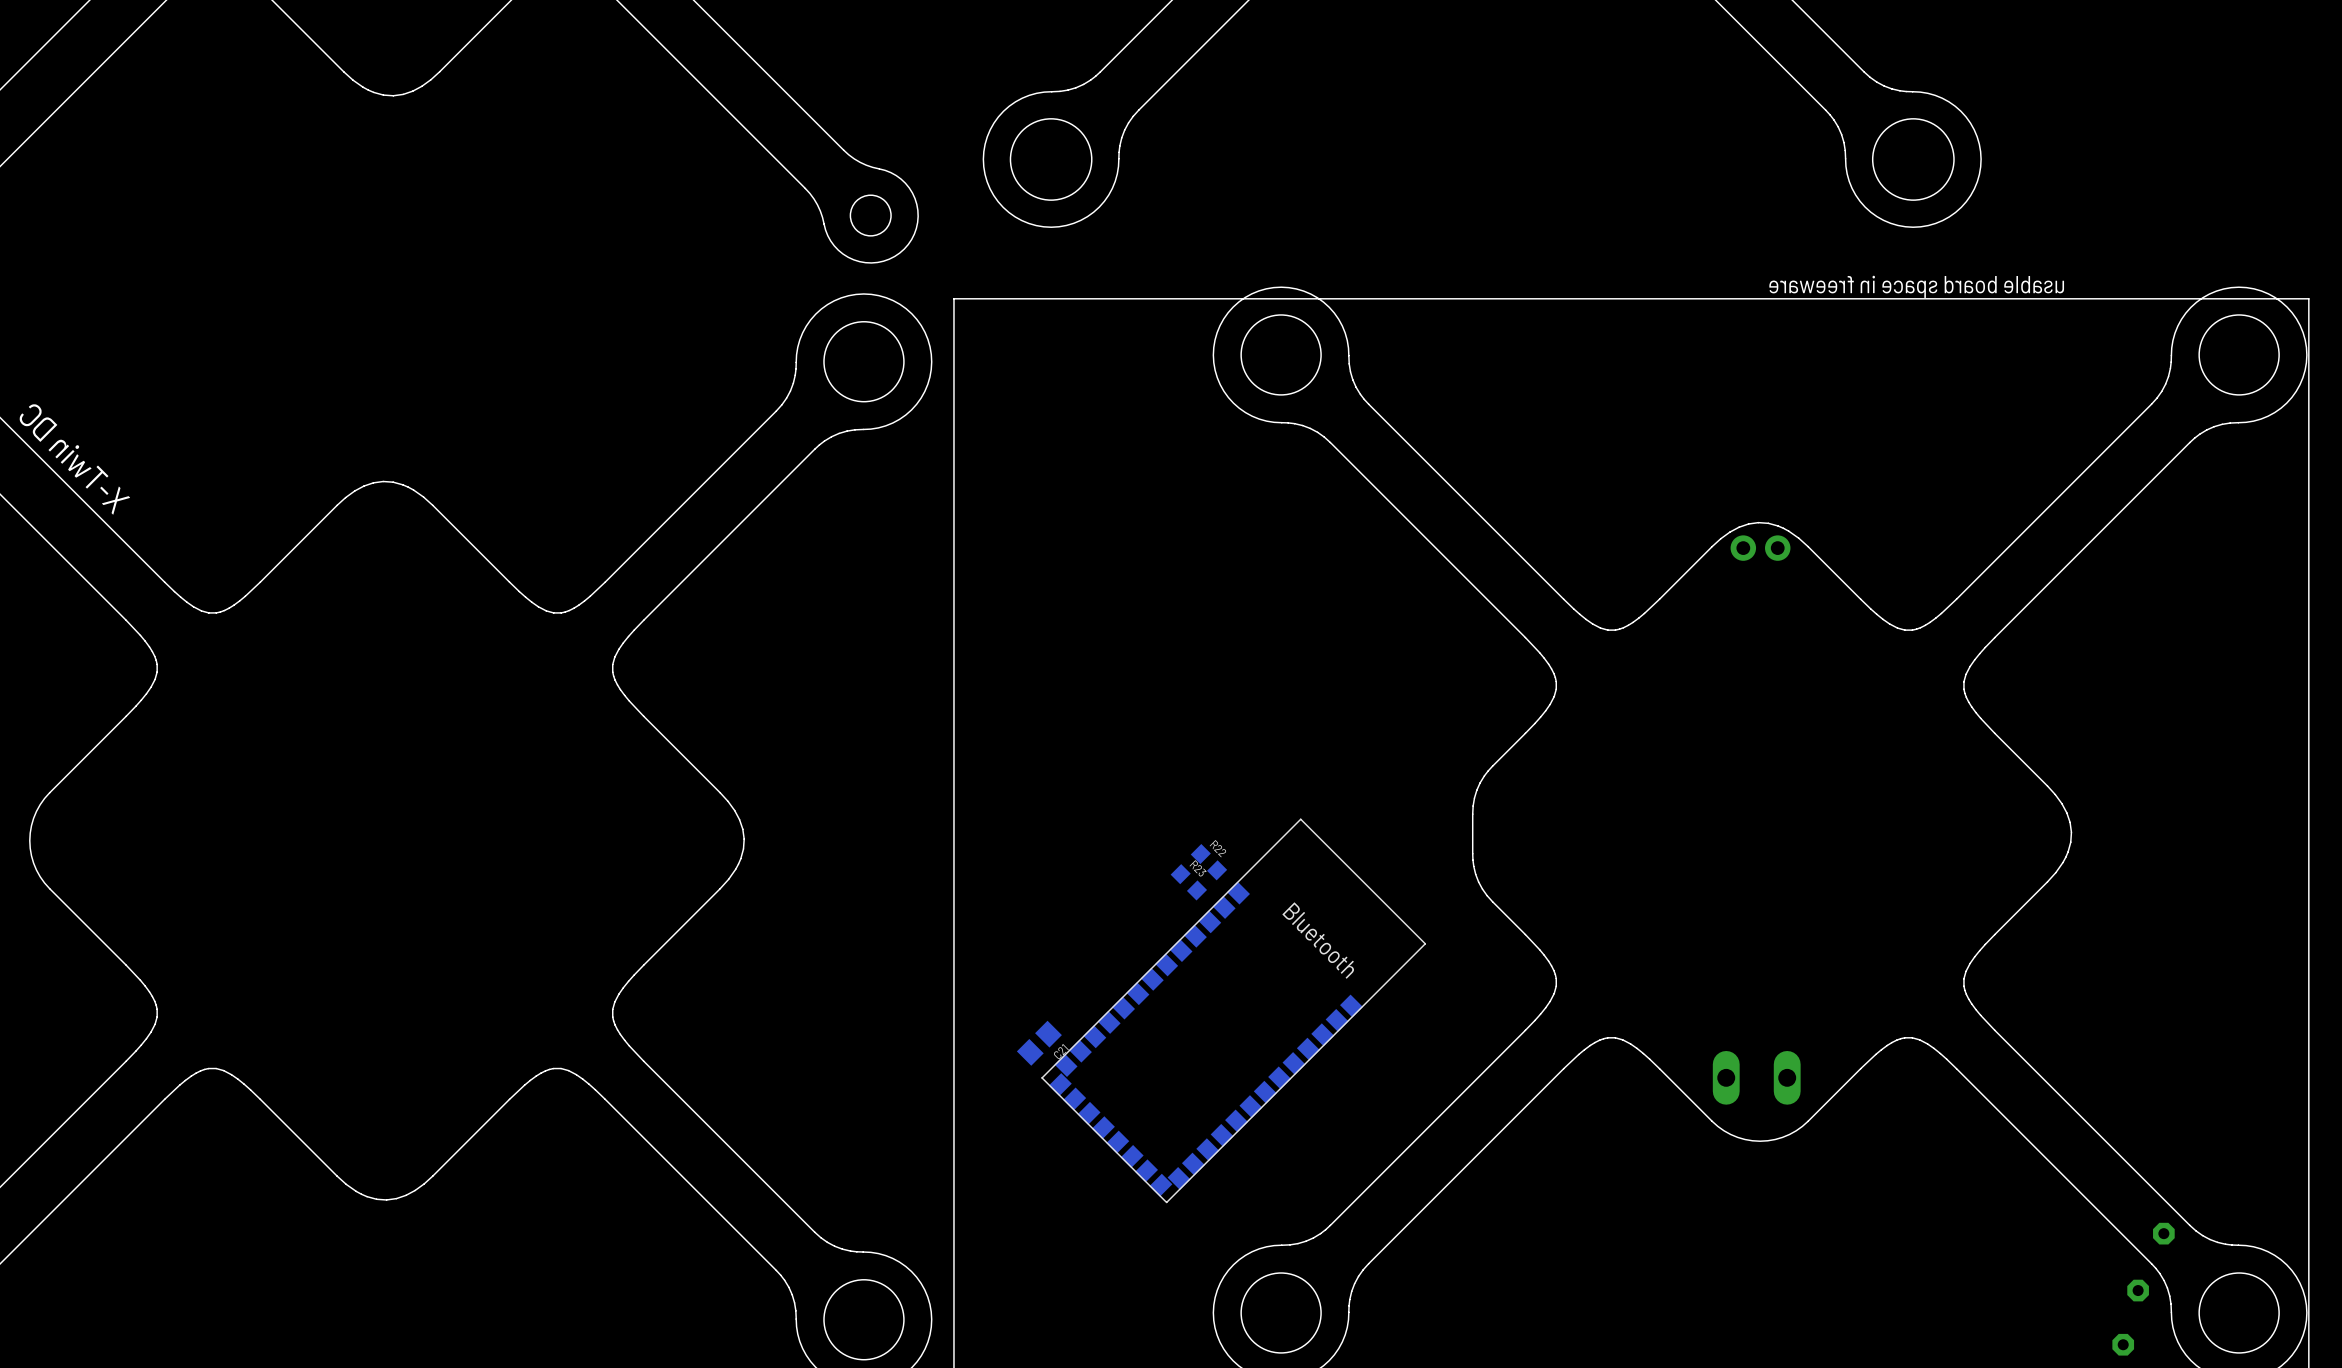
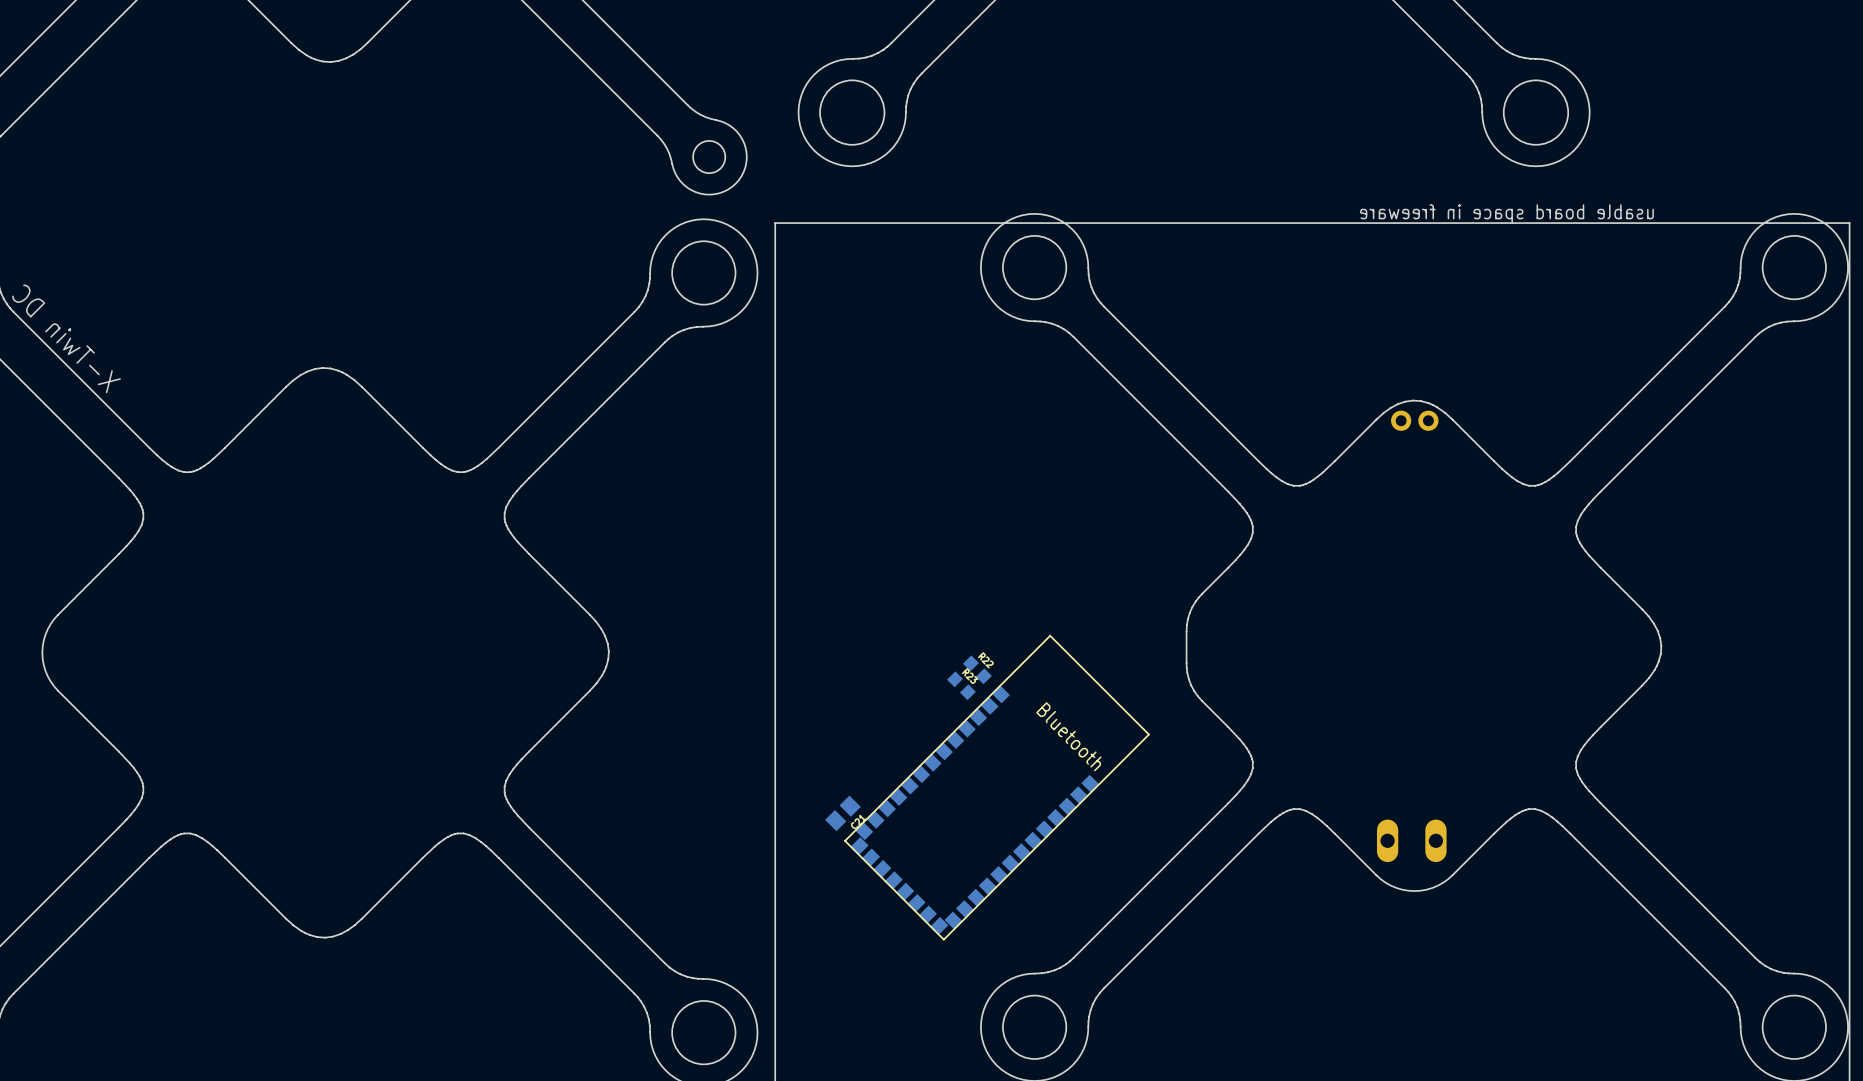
part: (2163, 1233) -> none
part: (2138, 1290) -> none
part: (2123, 1344) -> none

